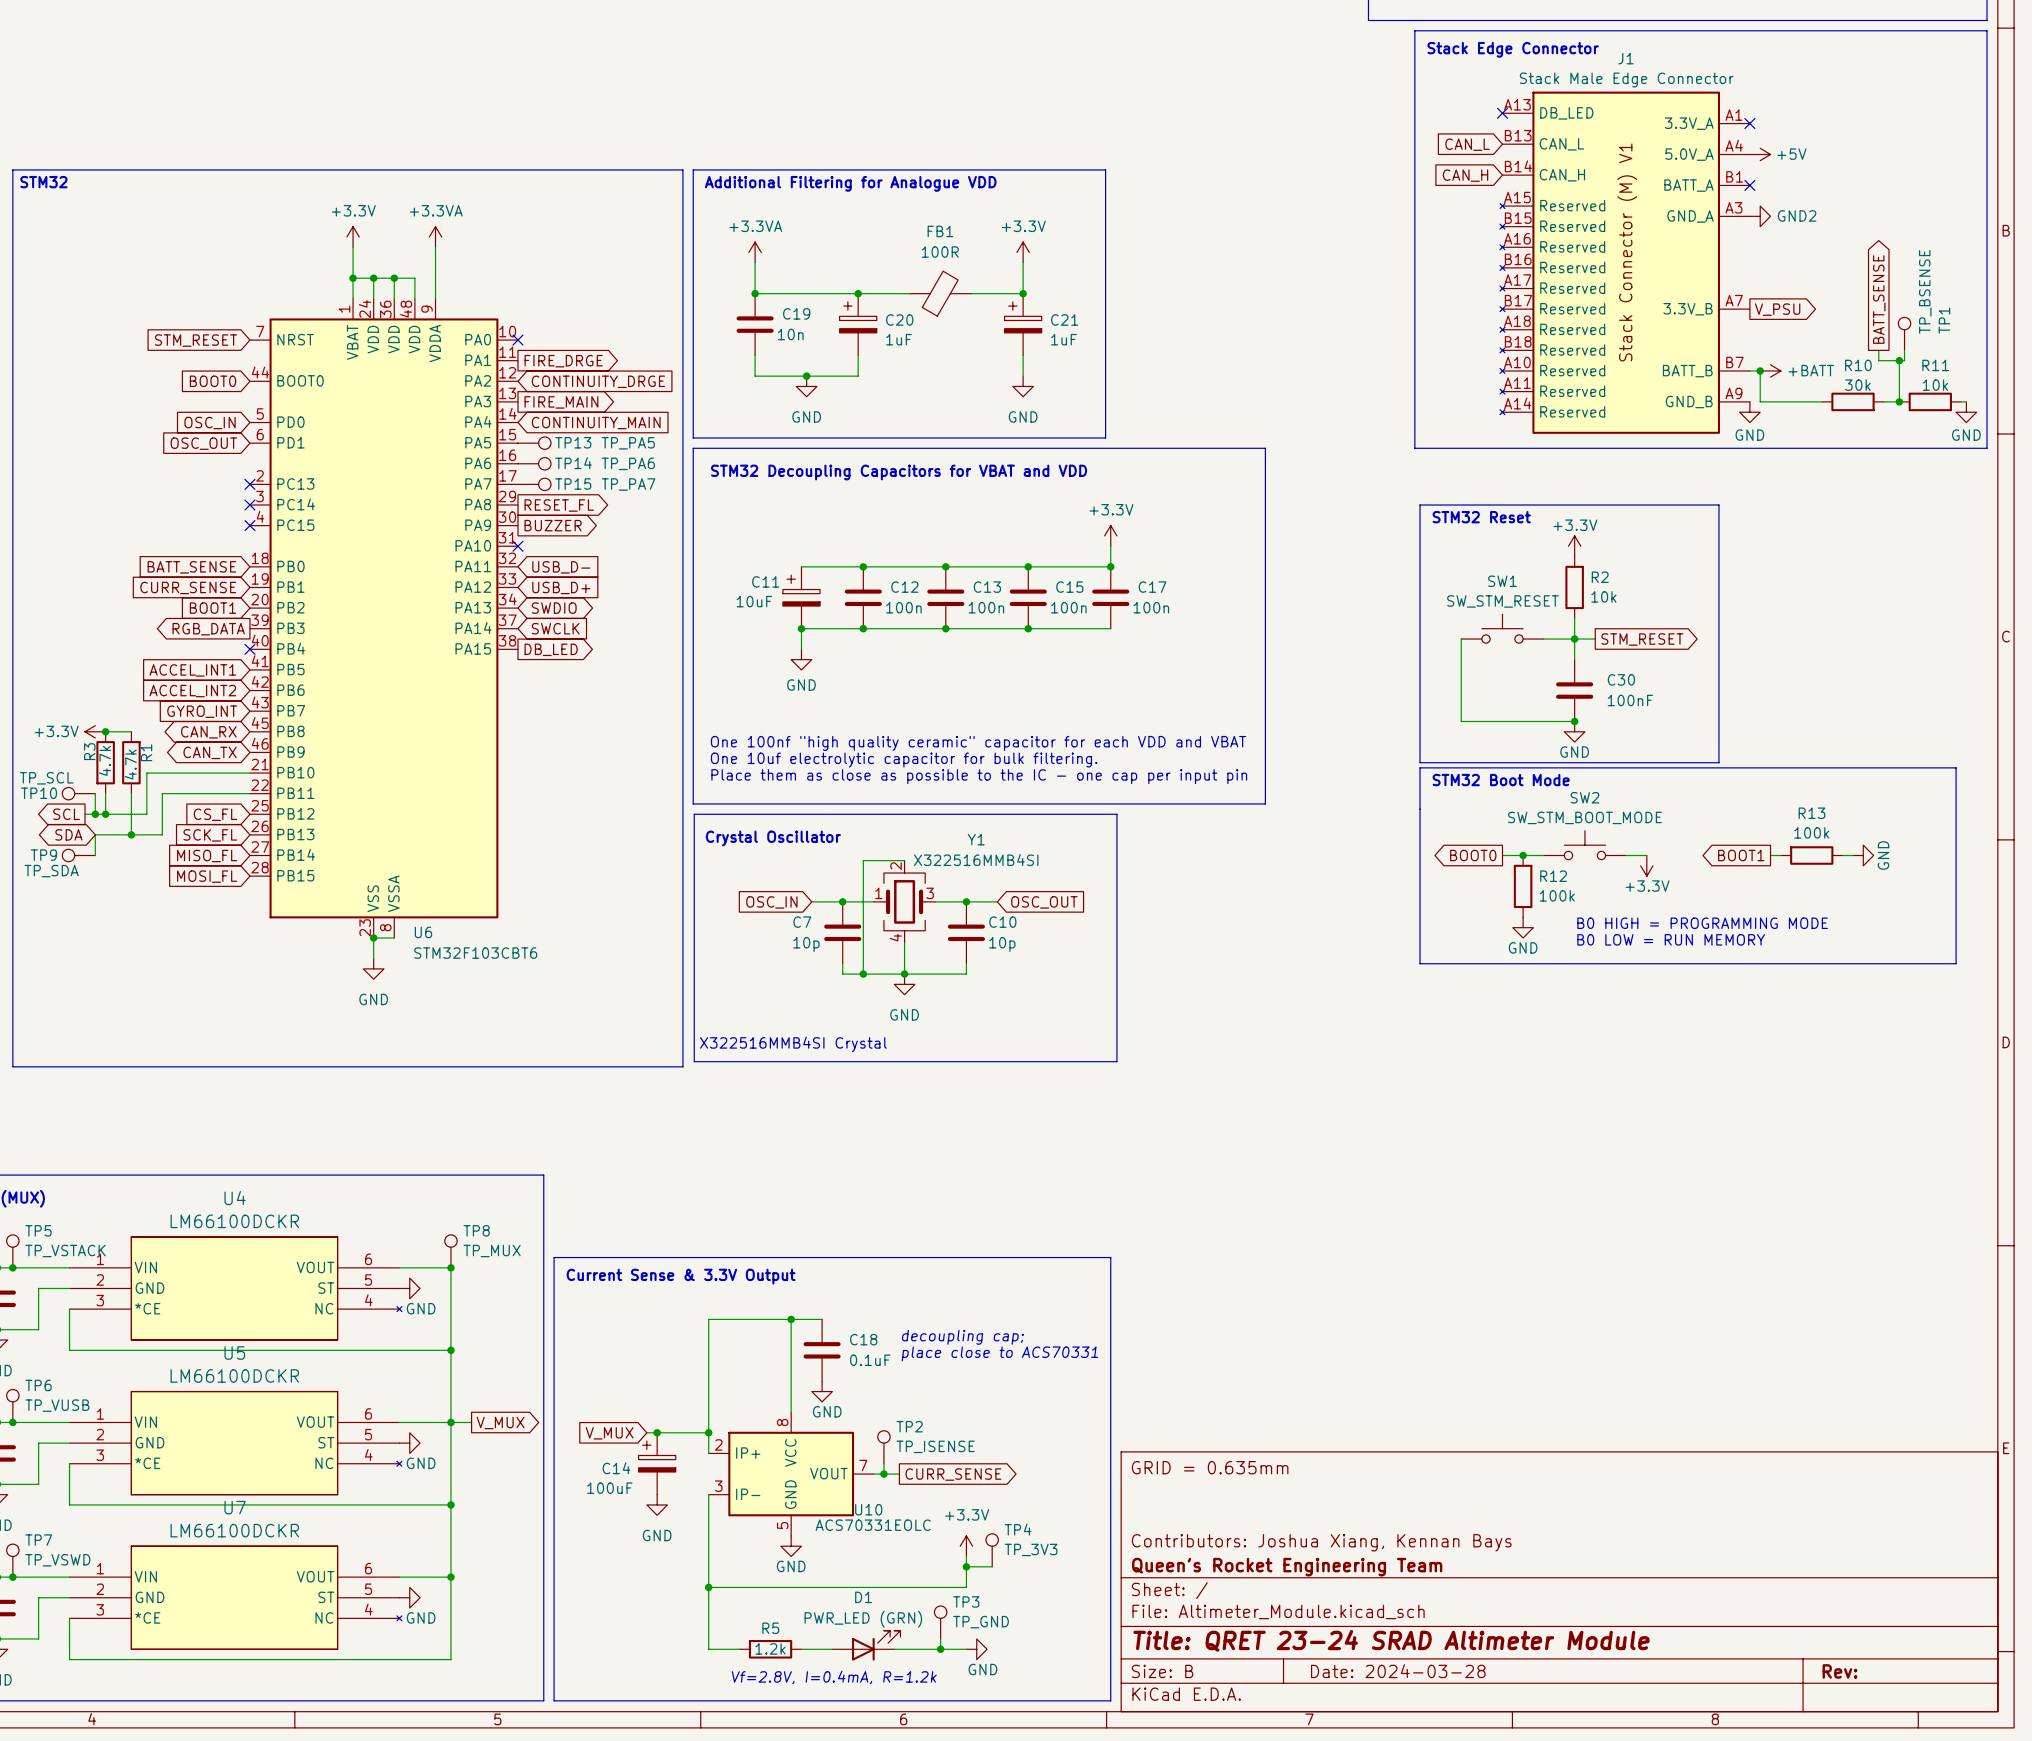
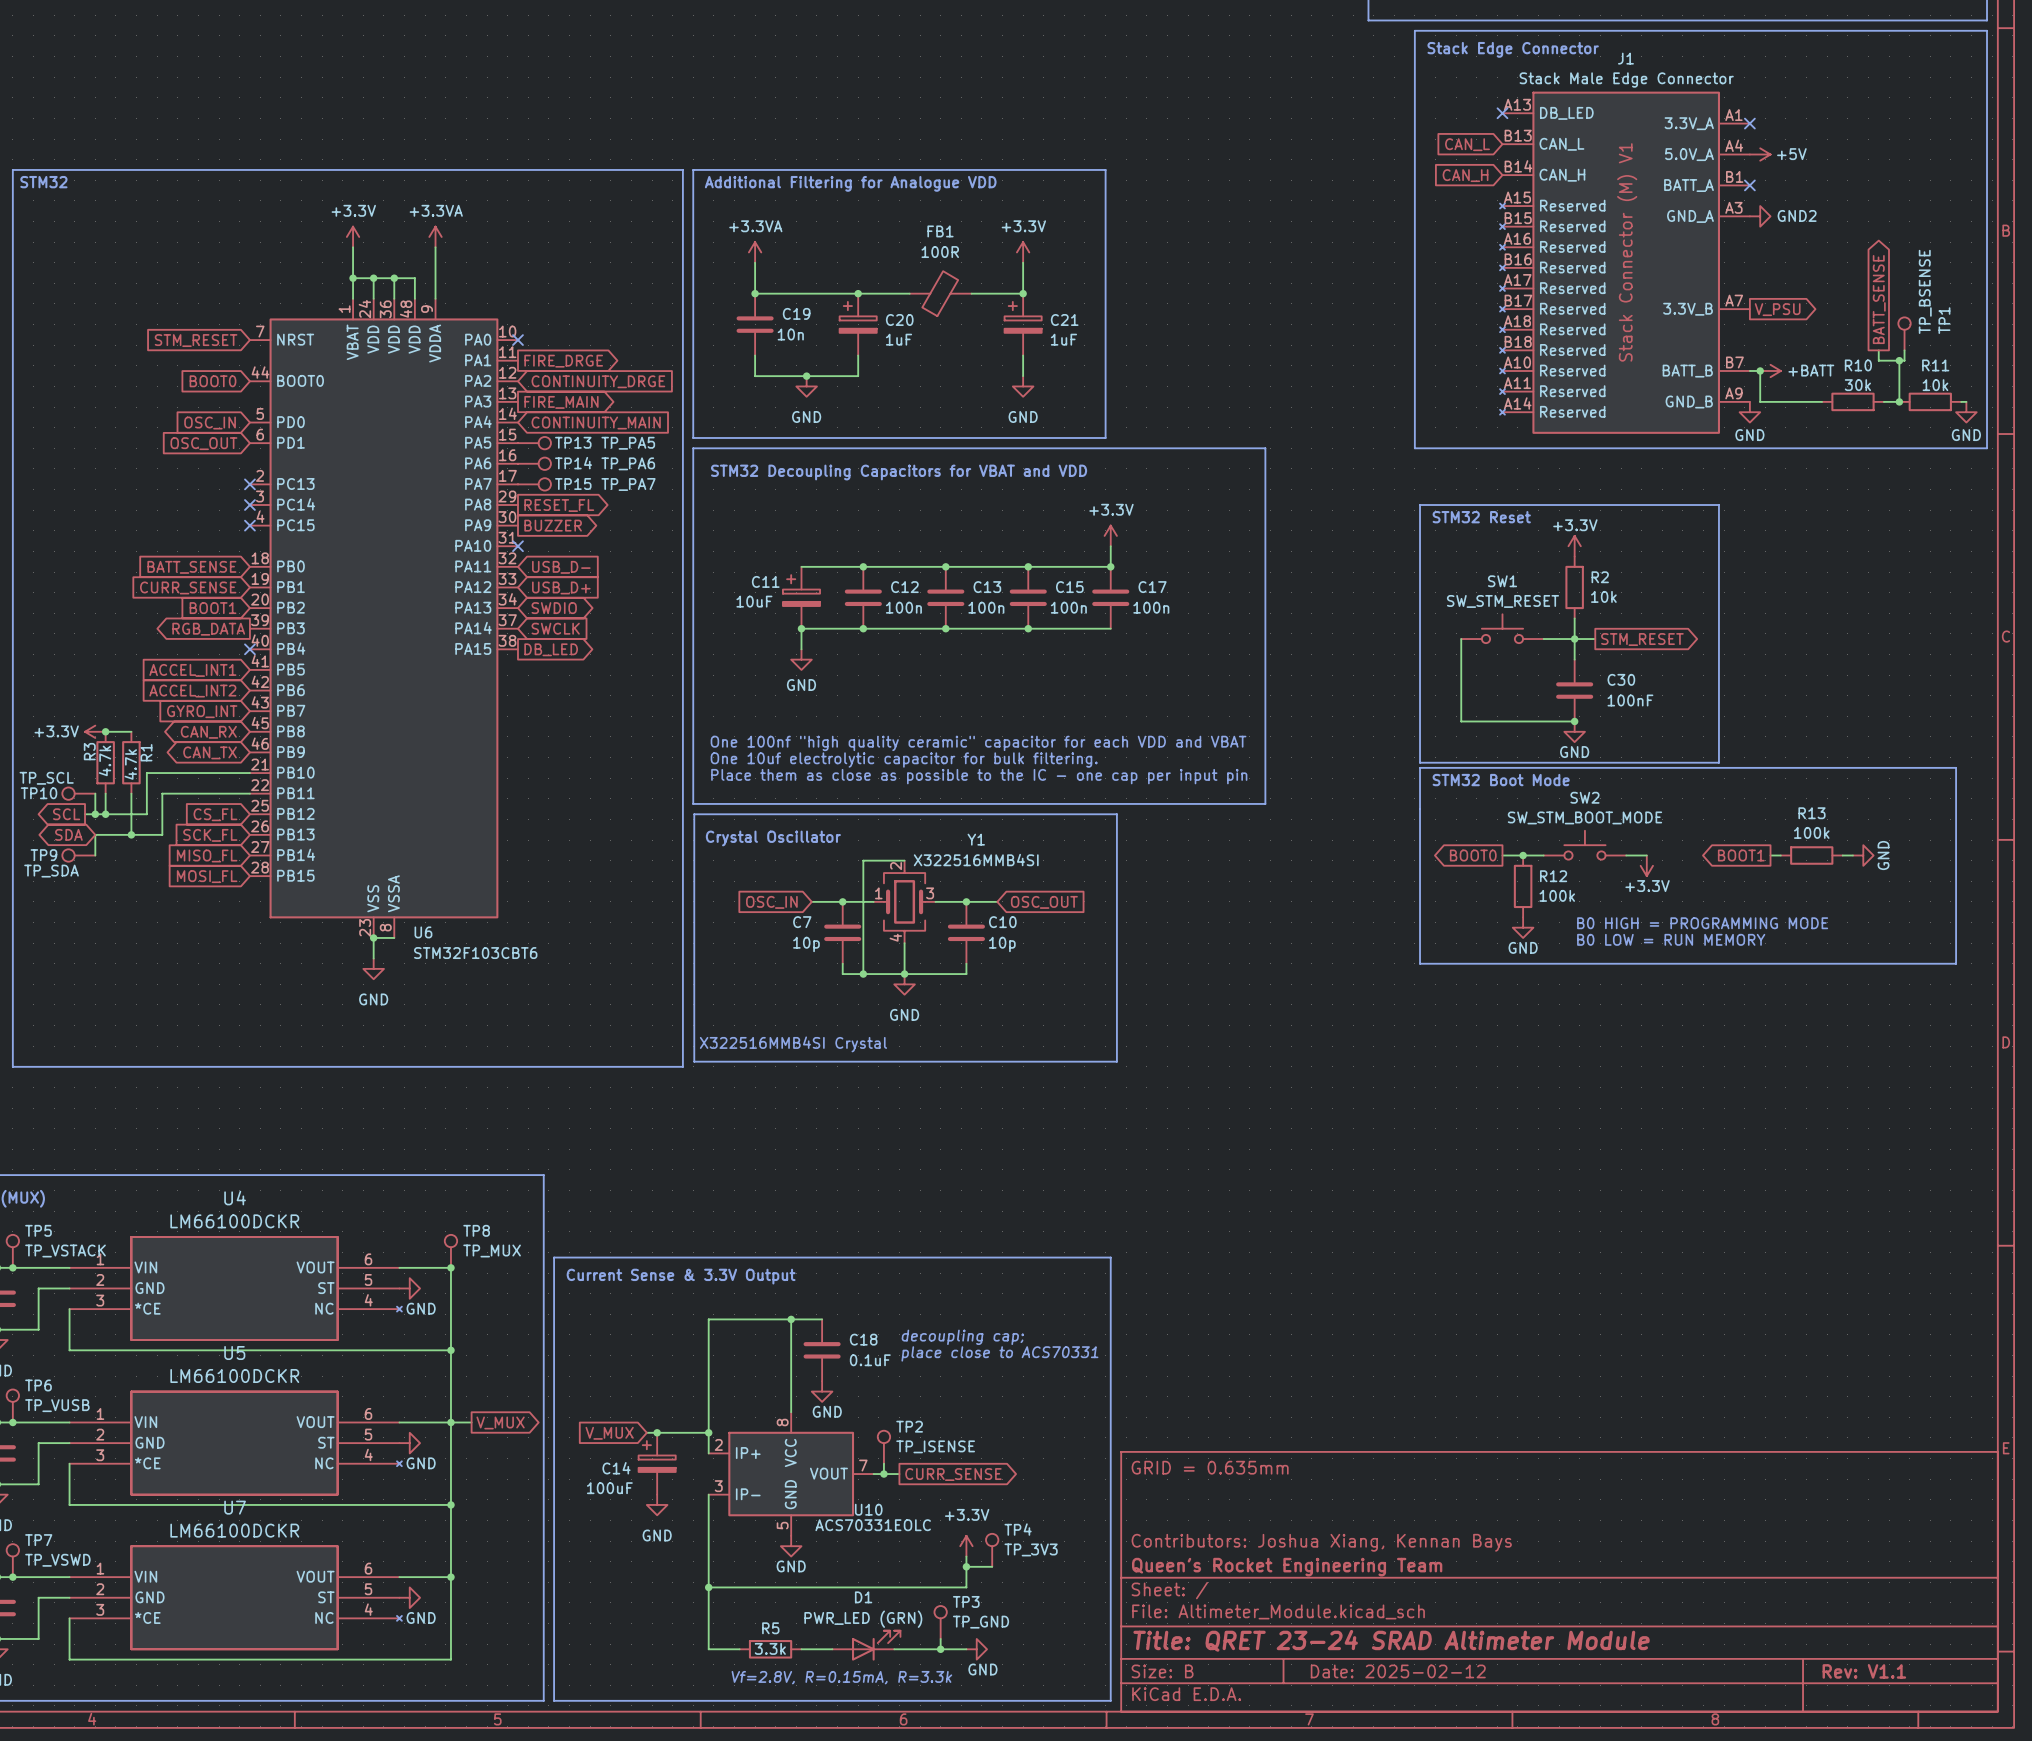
R5 value: 1.2k (770, 1648) -> 3.3k (770, 1648)
title block: Date: 2024-03-28 (1398, 1671) -> Date: 2025-02-12 (1398, 1671)
title block: Rev: (1840, 1671) -> Rev: V1.1 (1864, 1671)
text: Vf=2.8V, I=0.4mA, R=1.2k (834, 1677) -> Vf=2.8V, R=0.15mA, R=3.3k (841, 1677)

